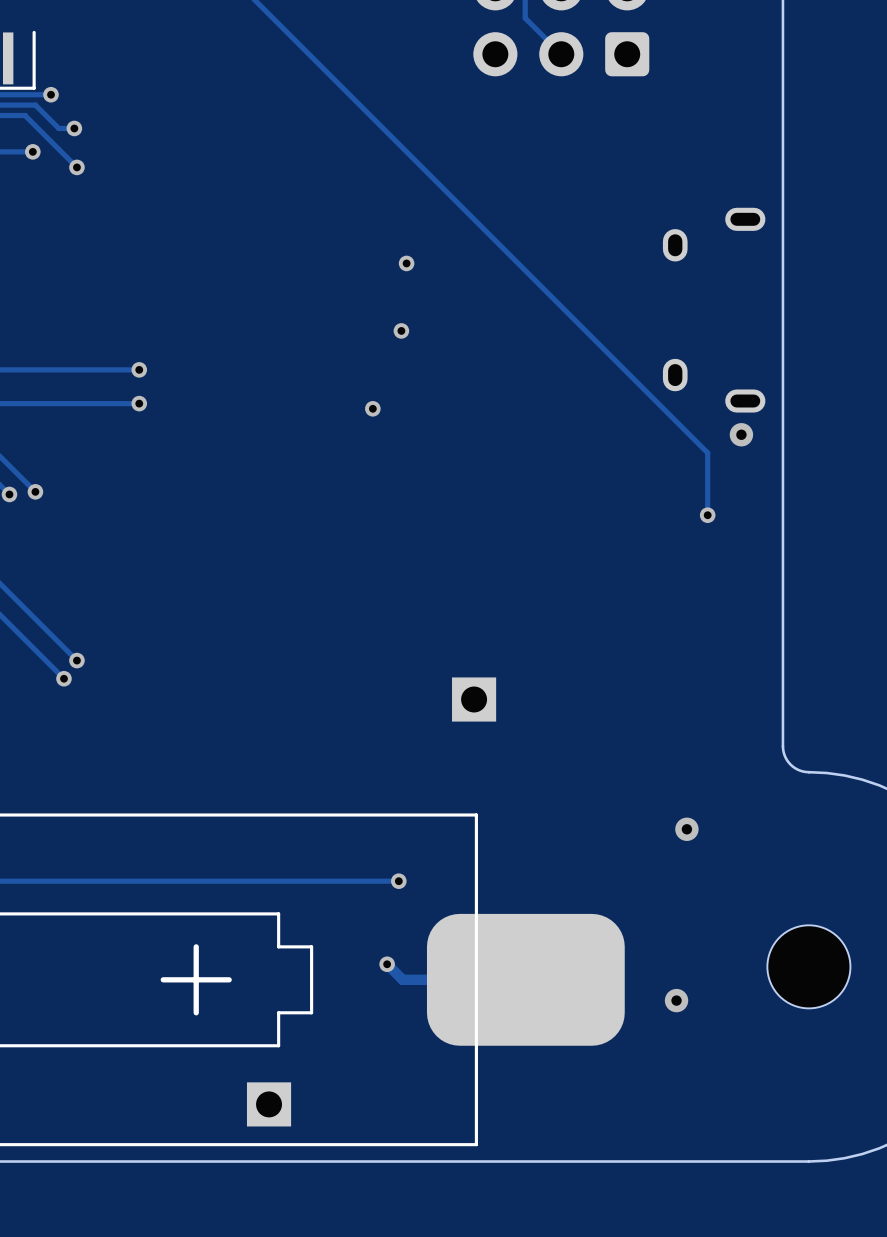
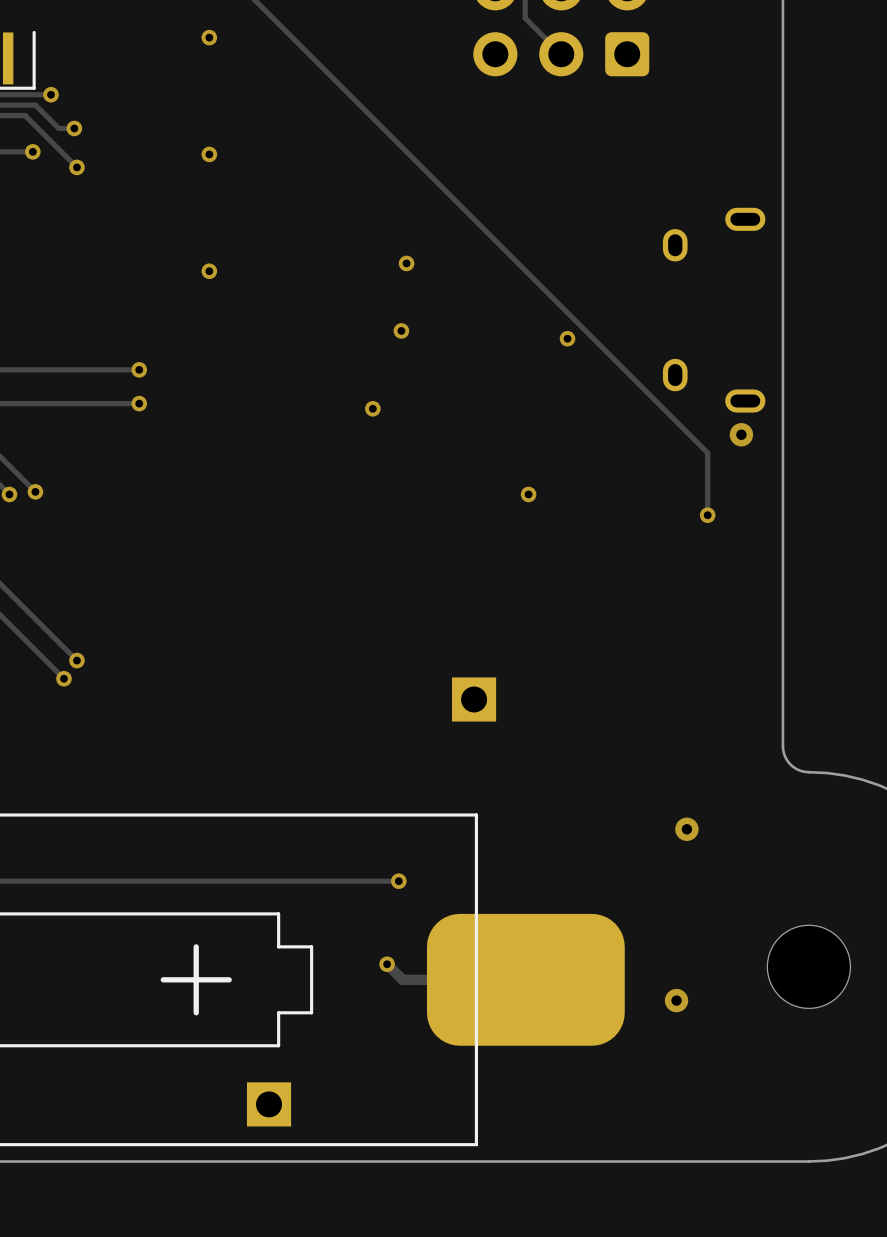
via: none -> (209, 37)
via: none -> (209, 154)
via: none -> (209, 271)
via: none -> (567, 338)
via: none -> (528, 494)

